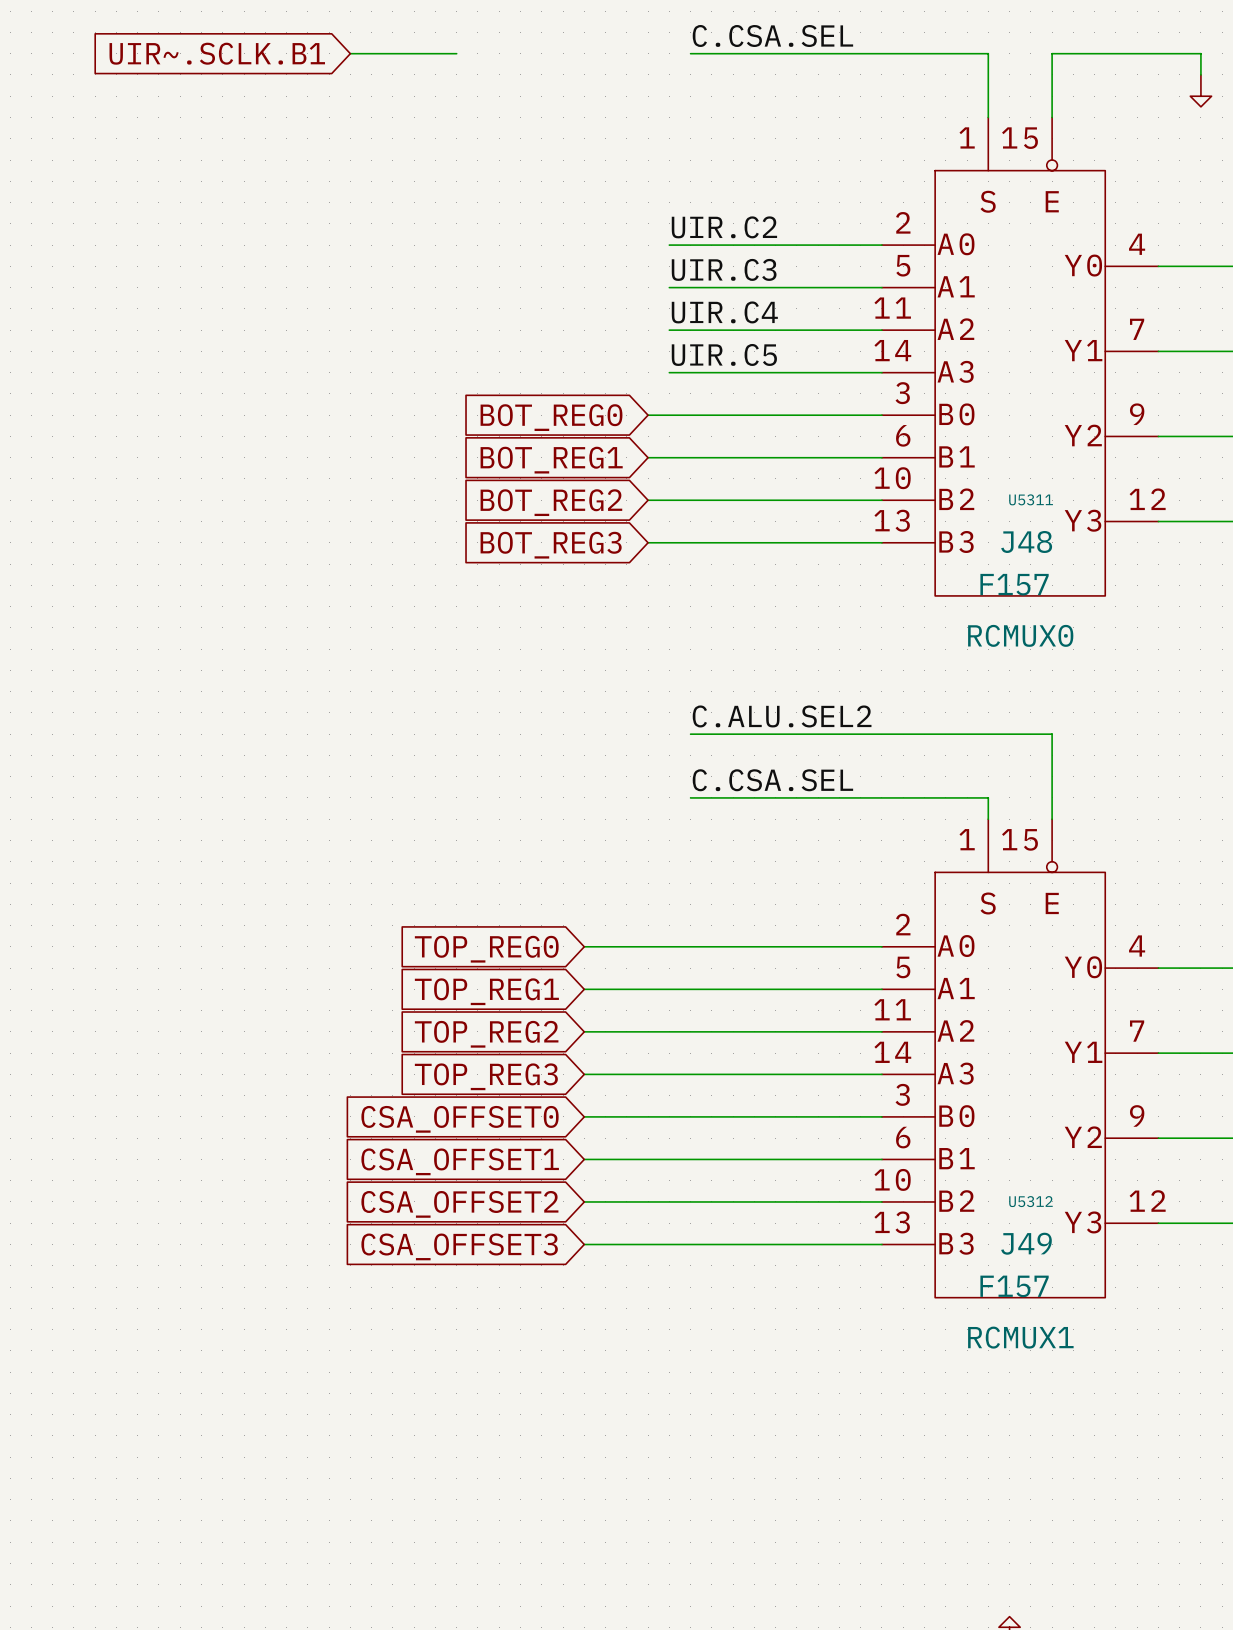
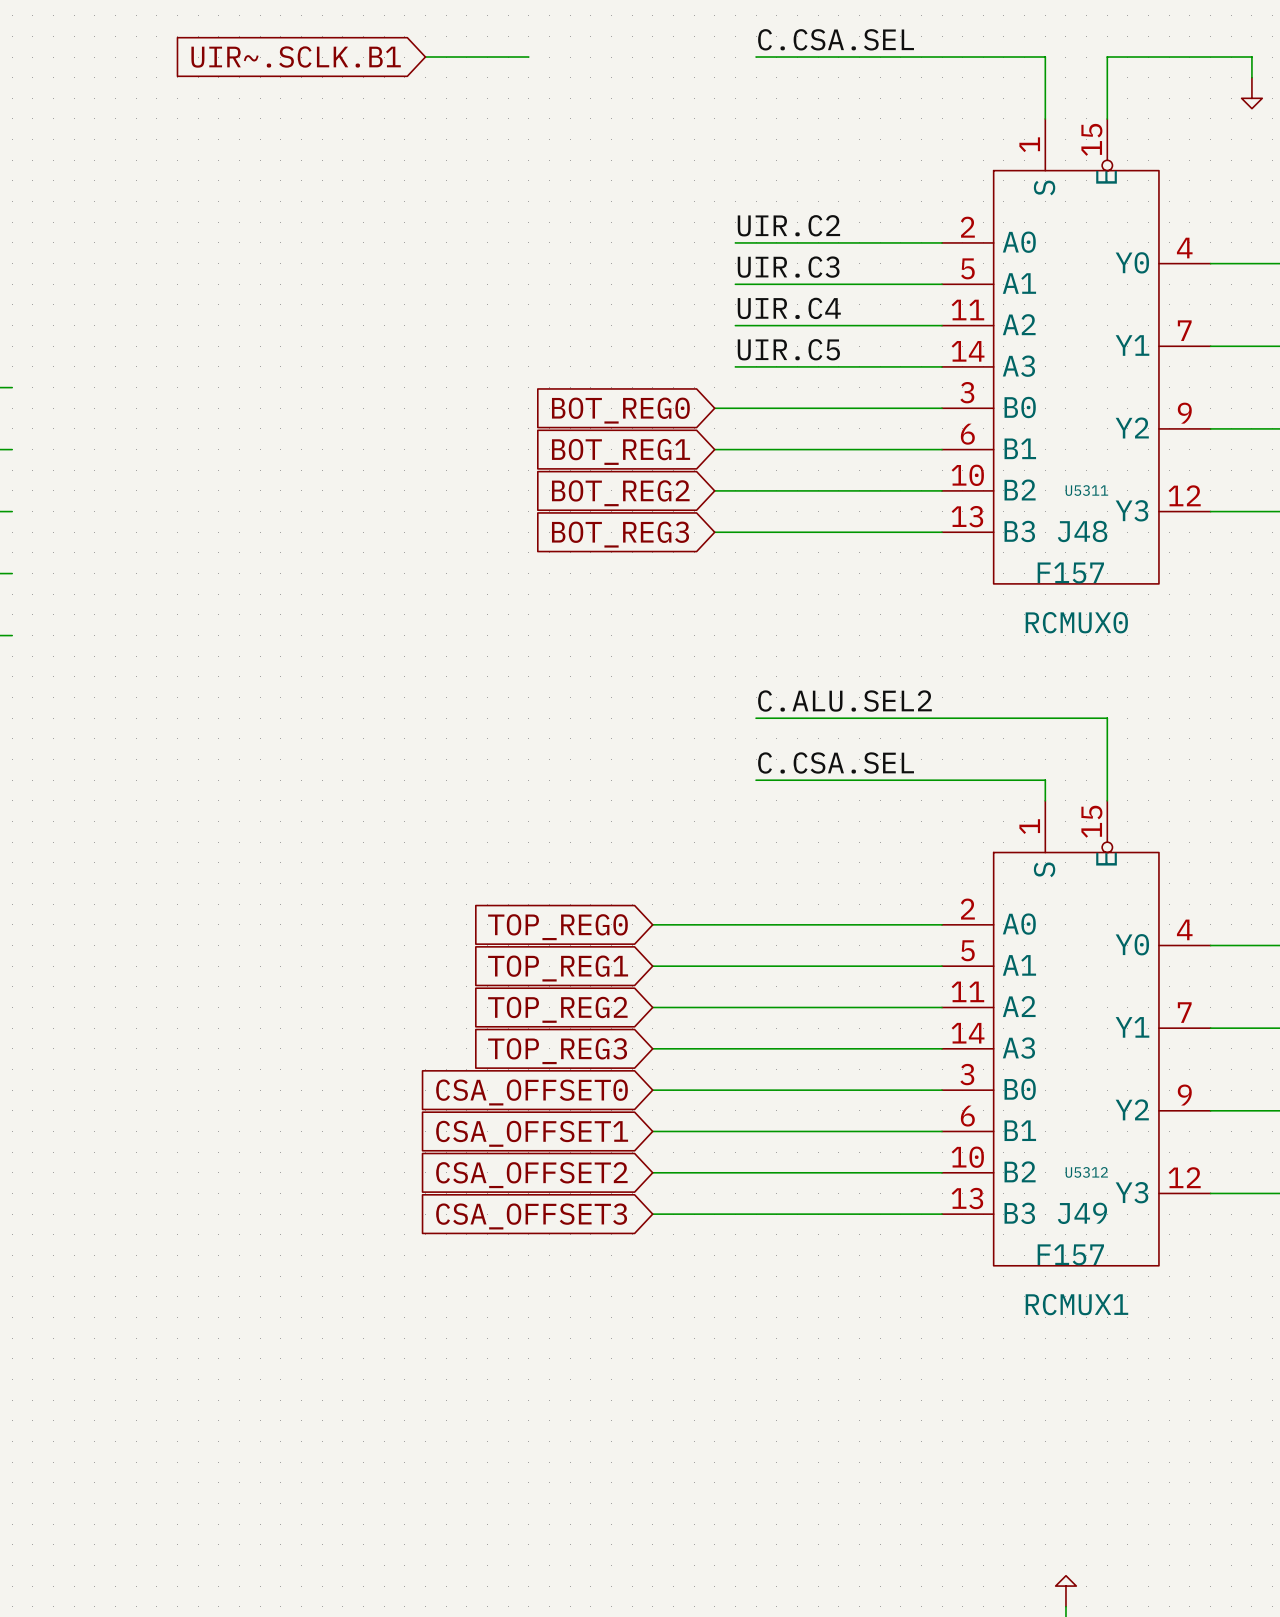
U5311 symbol: [881, 117, 1159, 596] -> [942, 118, 1211, 584]
U5312 symbol: [881, 819, 1159, 1298] -> [942, 800, 1211, 1266]

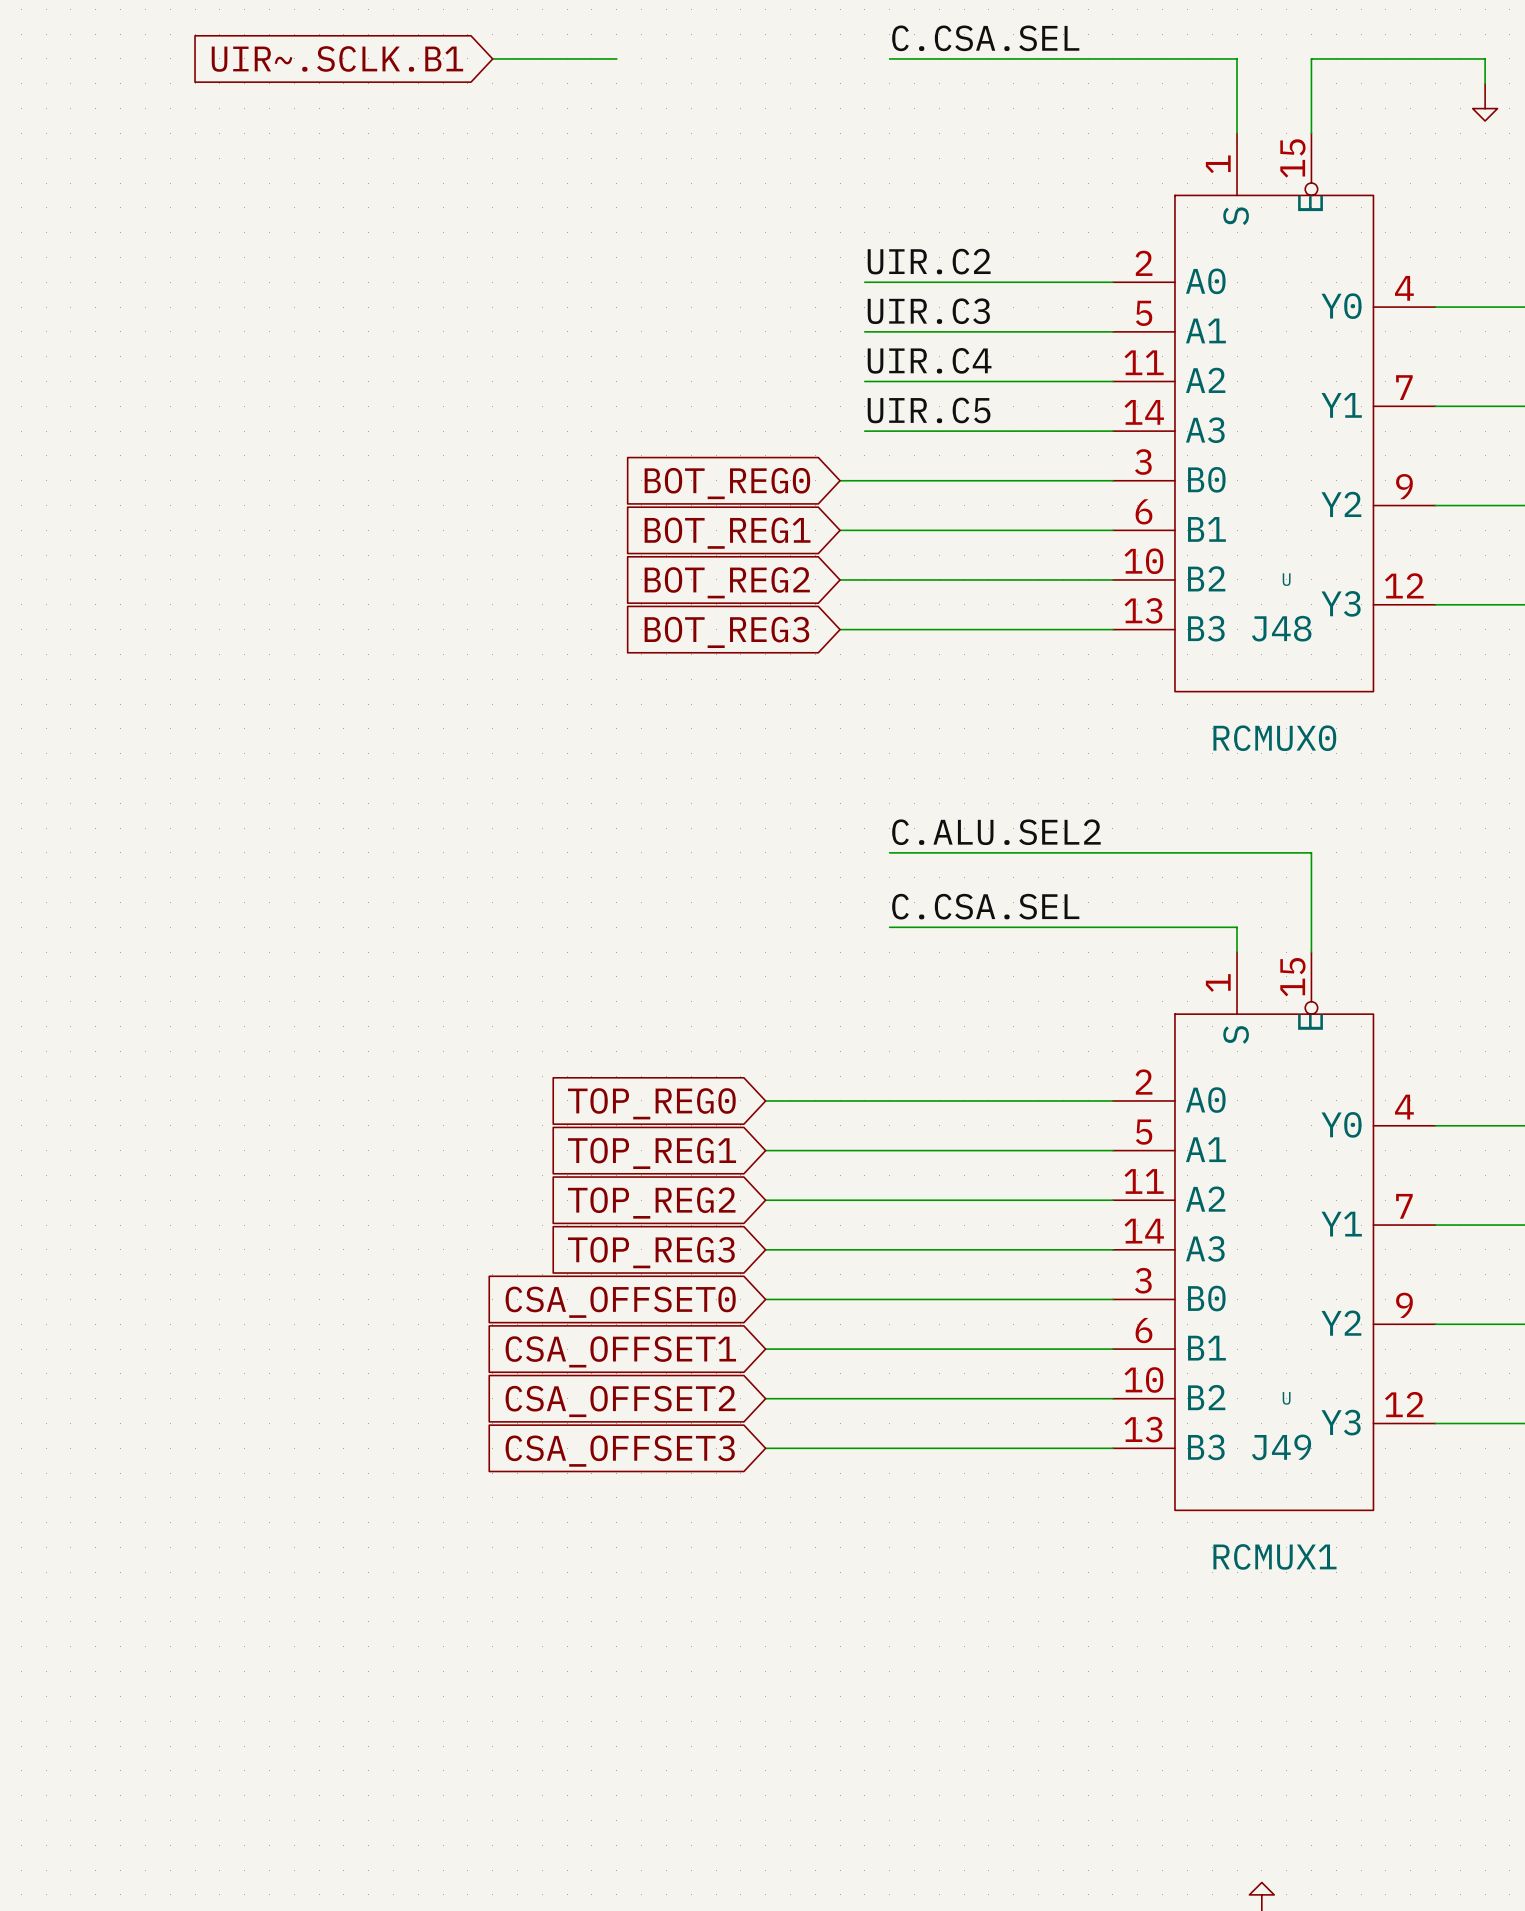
U5311 name: U5311 (1086, 490) -> U (1286, 579)
U5311 value: F157 (1070, 572) -> none
U5312 name: U5312 (1086, 1172) -> U (1286, 1398)
U5312 value: F157 (1070, 1254) -> none

